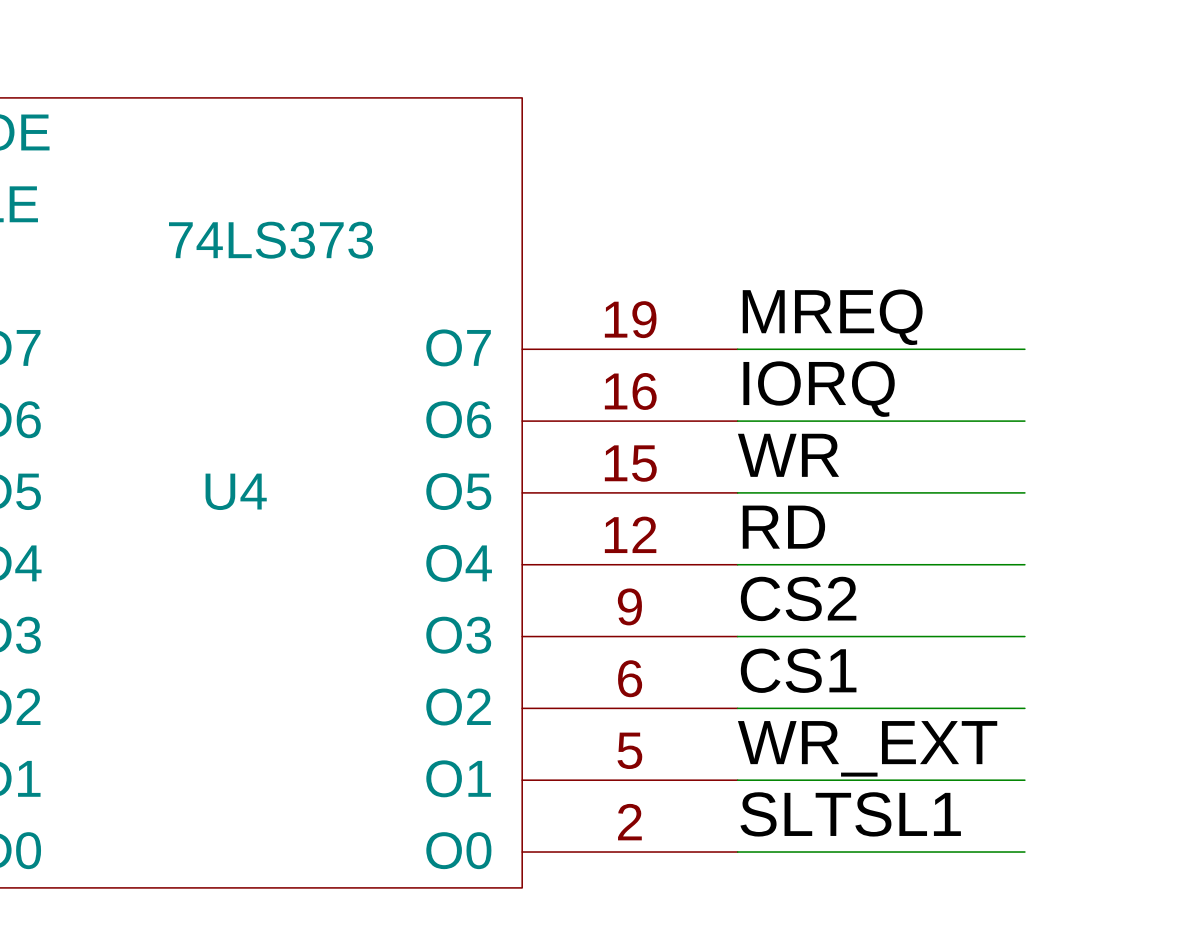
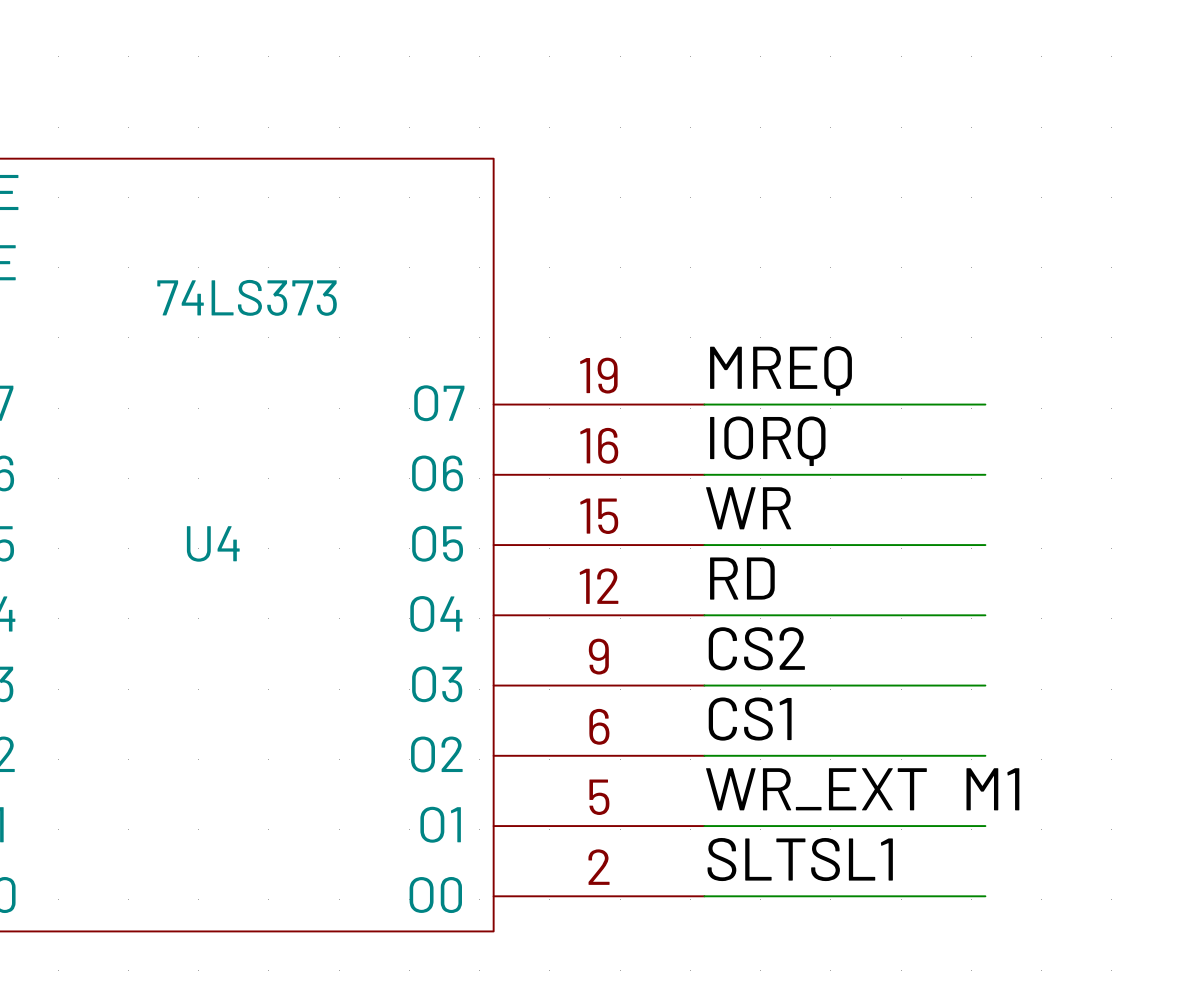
label: none -> M1 (992, 789)

